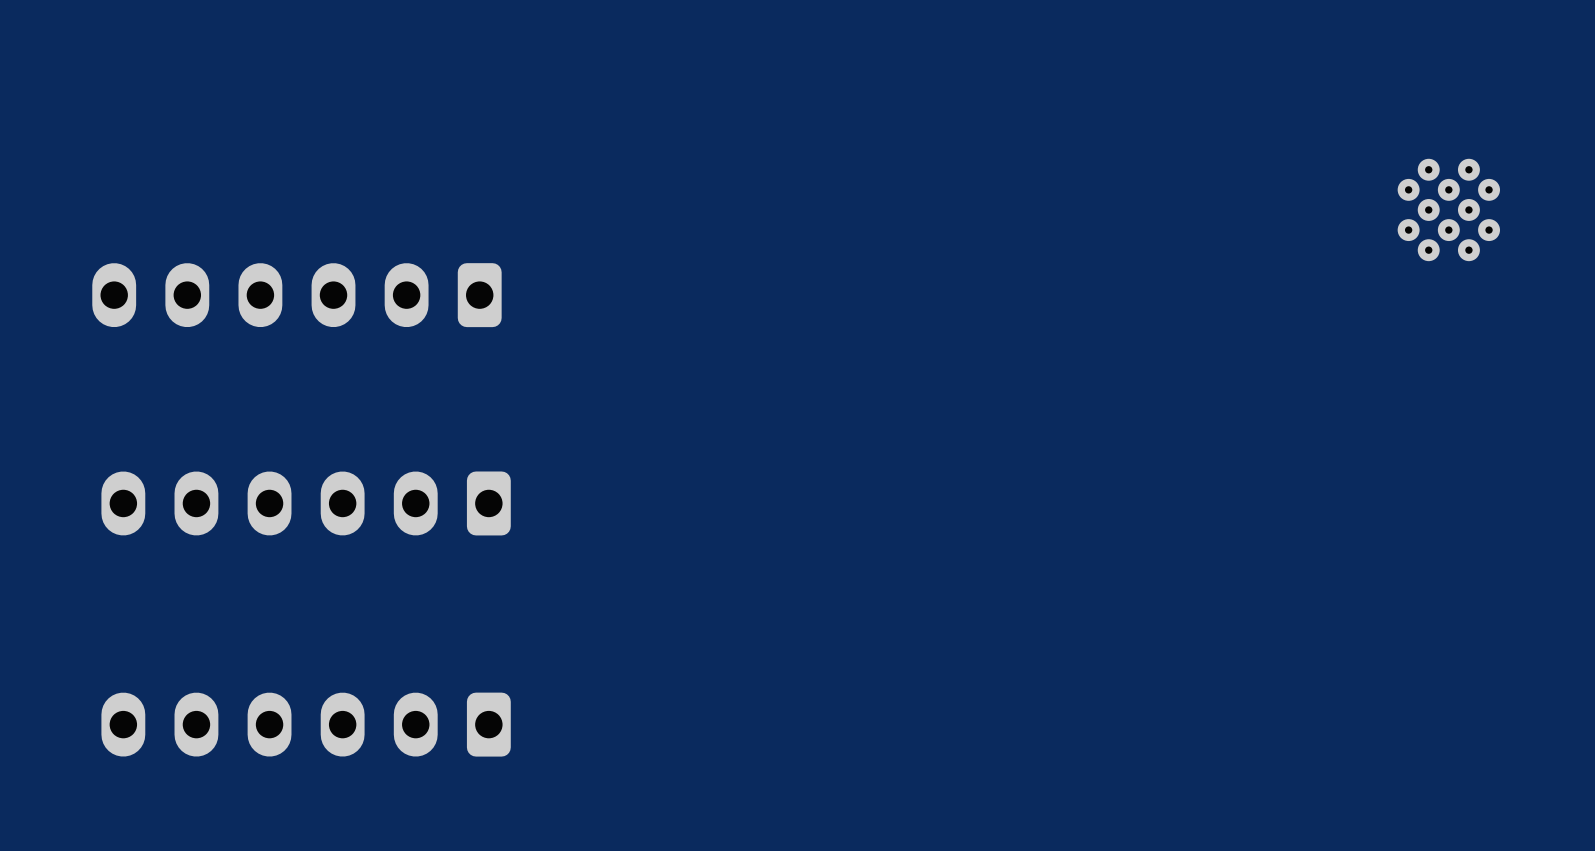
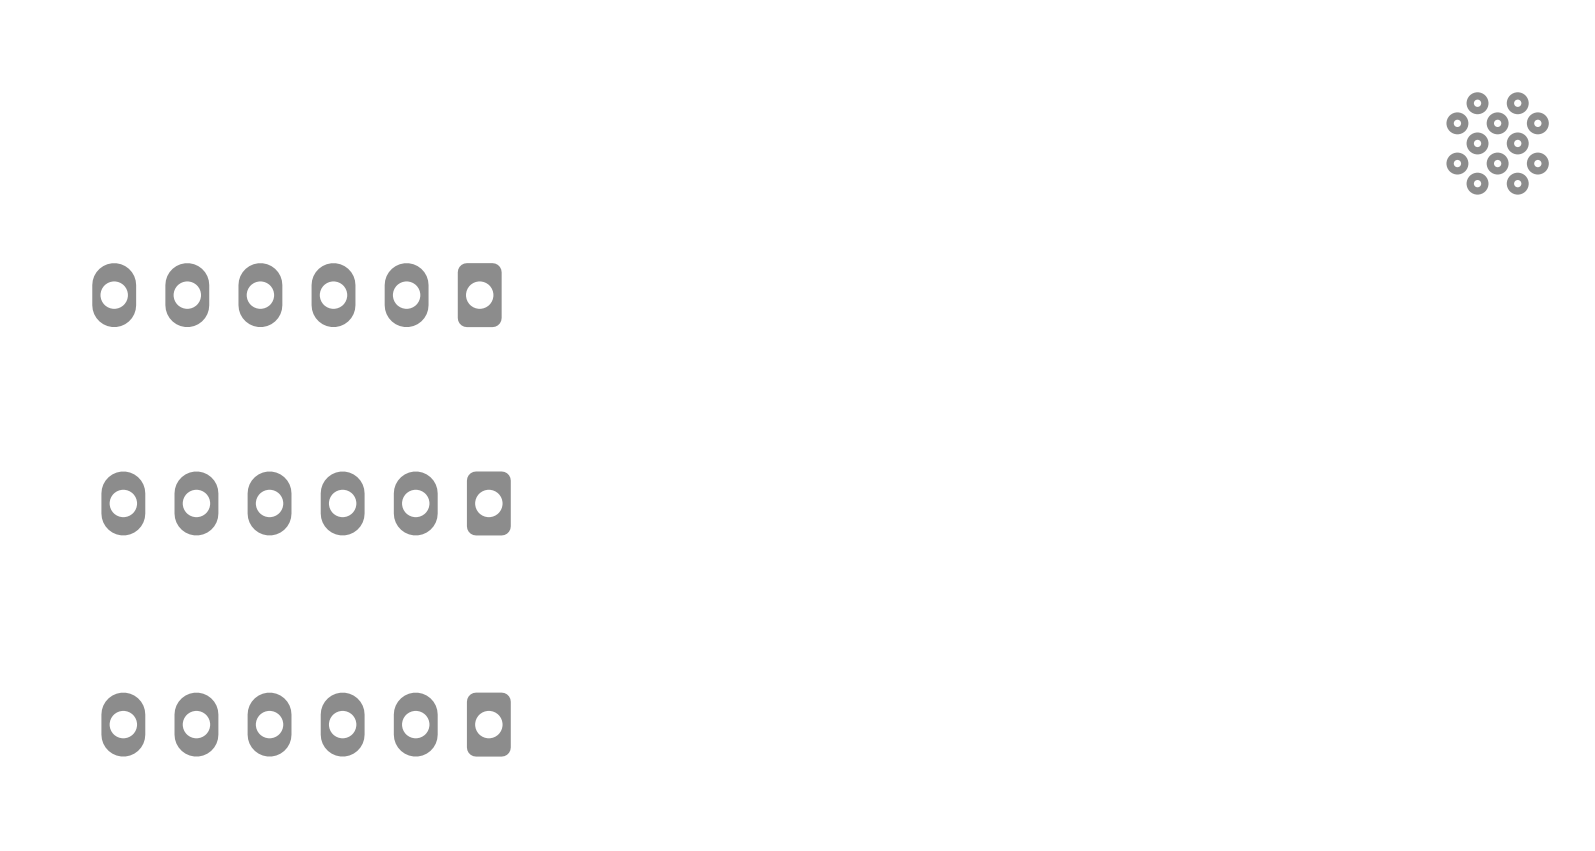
part position: (1448, 209) -> (1497, 143)

